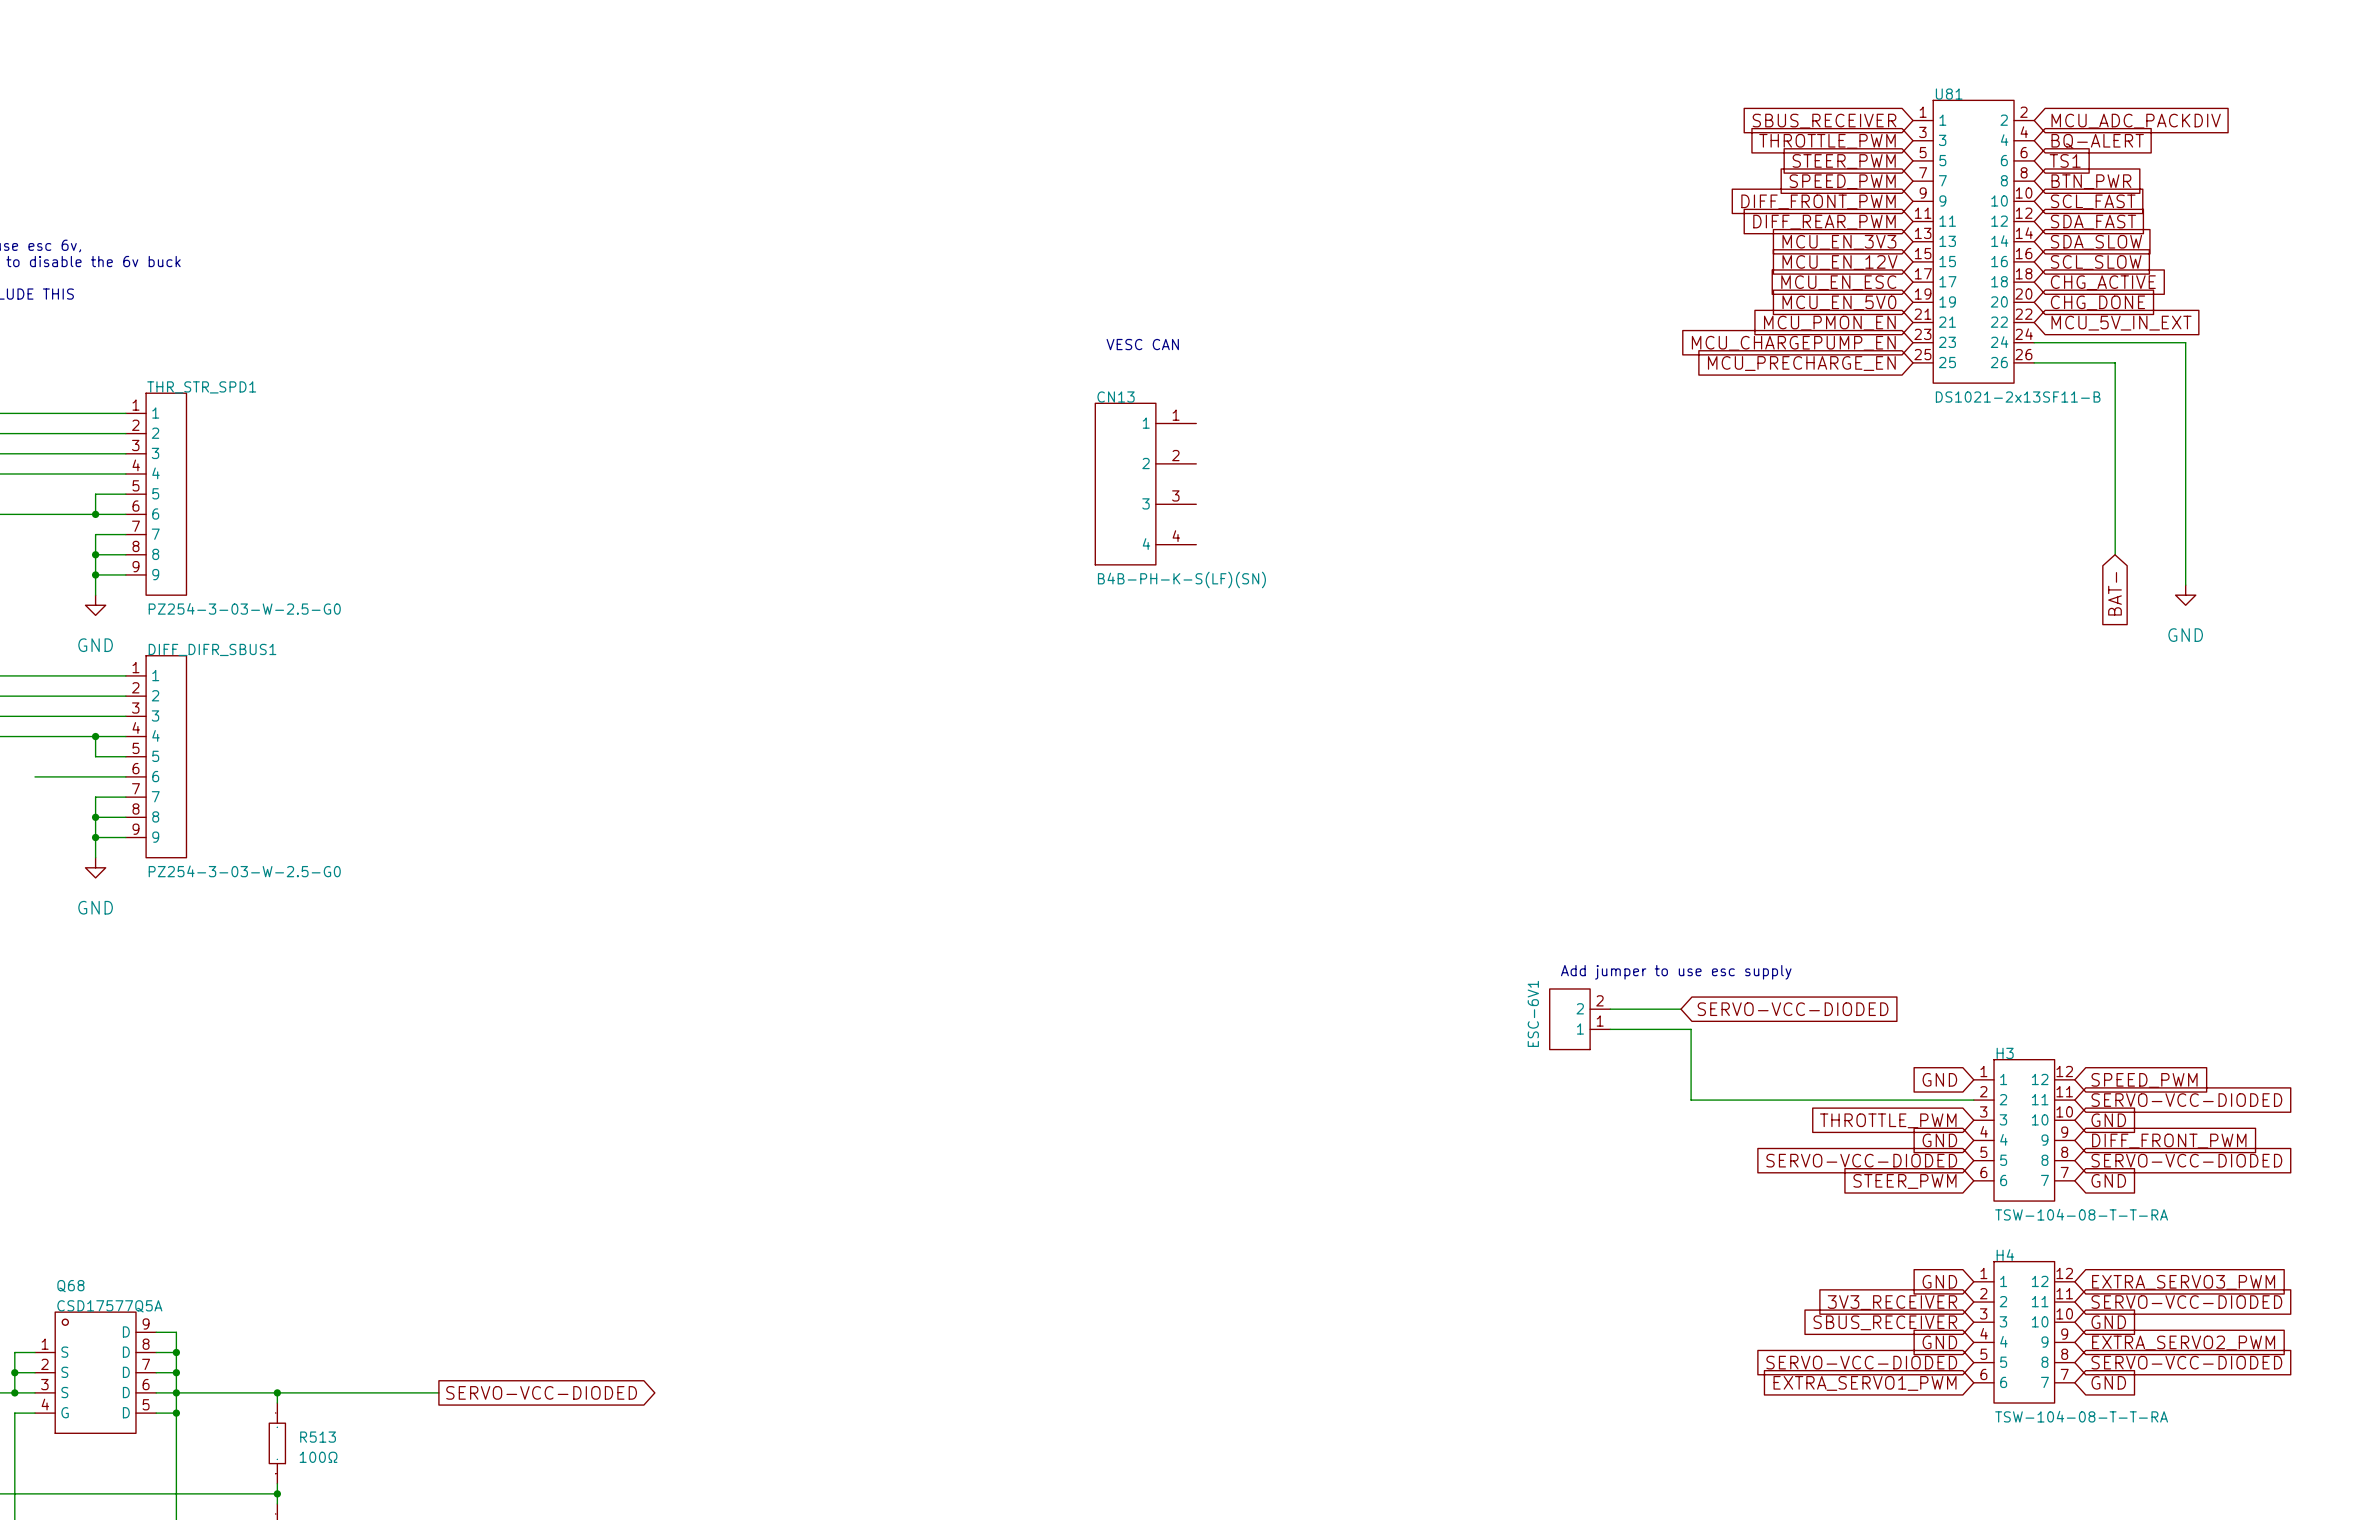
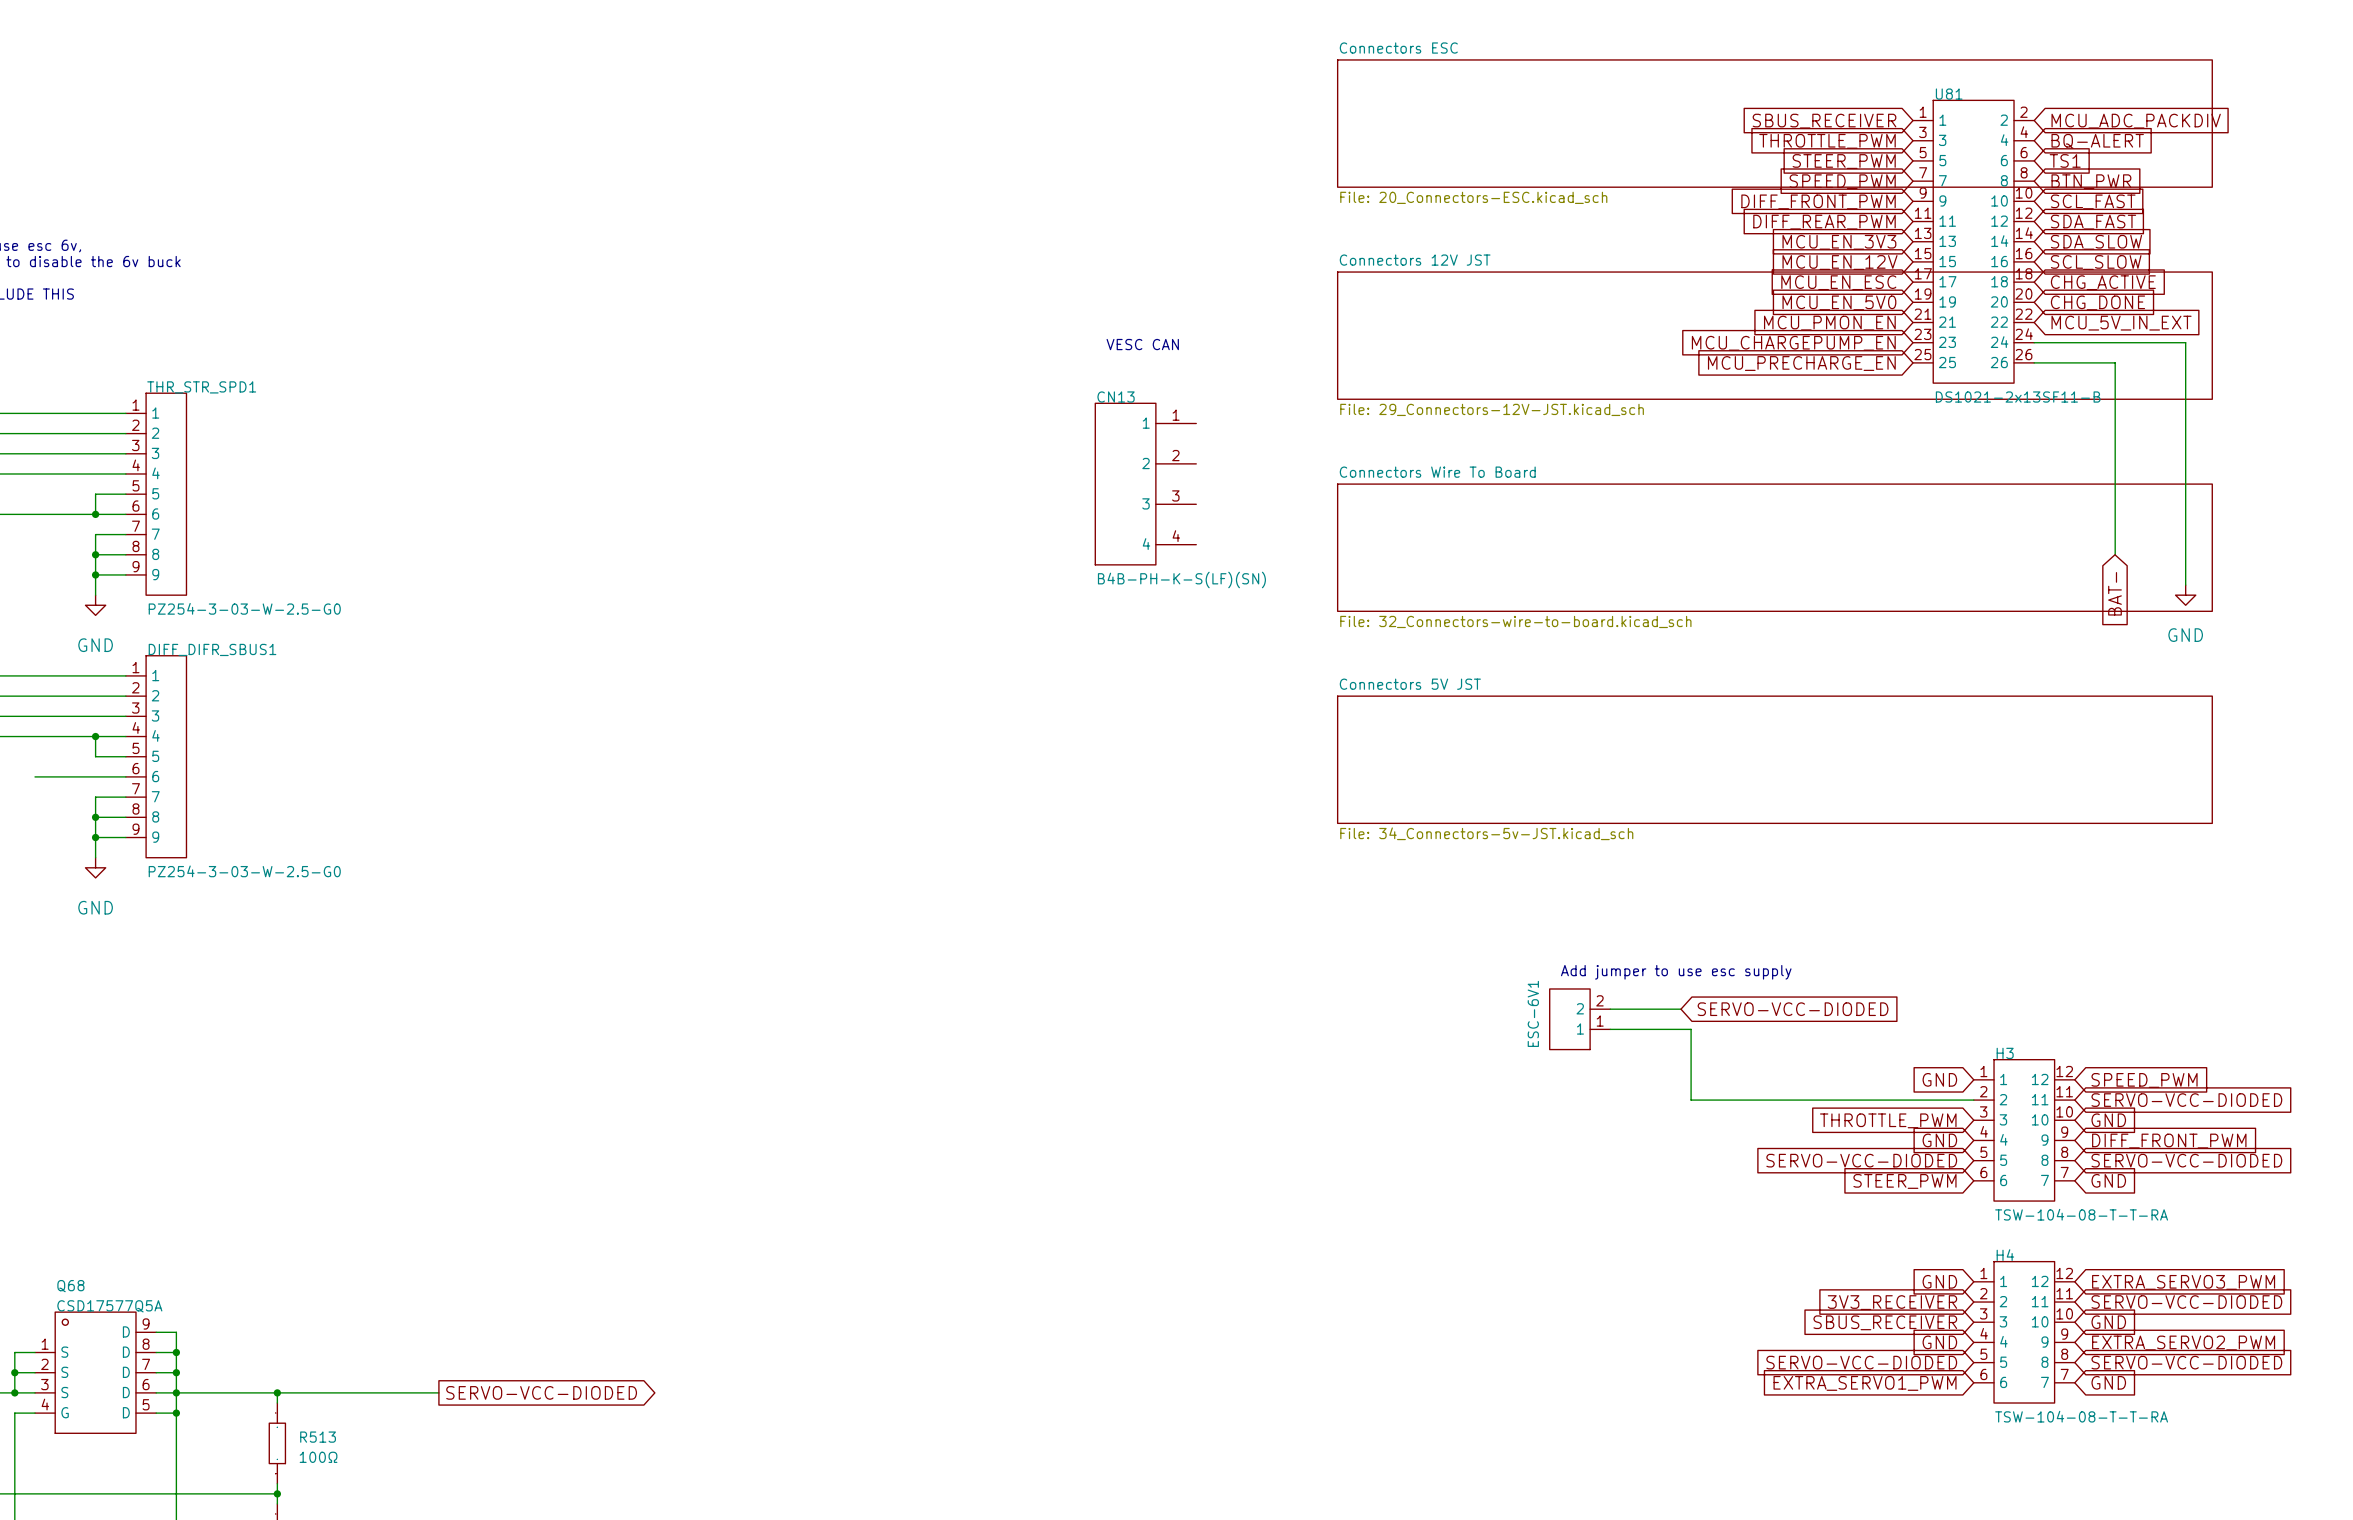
sheet Connectors ESC: none -> File: 20_Connectors-ESC.kicad_sch (1774, 123)
sheet Connectors 12V JST: none -> File: 29_Connectors-12V-JST.kicad_sch (1774, 335)
sheet Connectors Wire To Board: none -> File: 32_Connectors-wire-to-board.kicad_sch (1774, 547)
sheet Connectors 5V JST: none -> File: 34_Connectors-5v-JST.kicad_sch (1774, 759)

